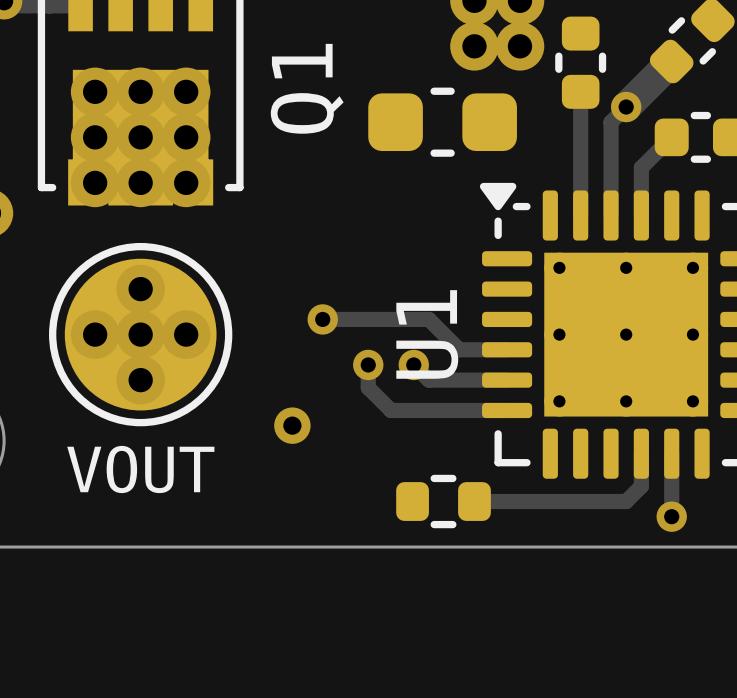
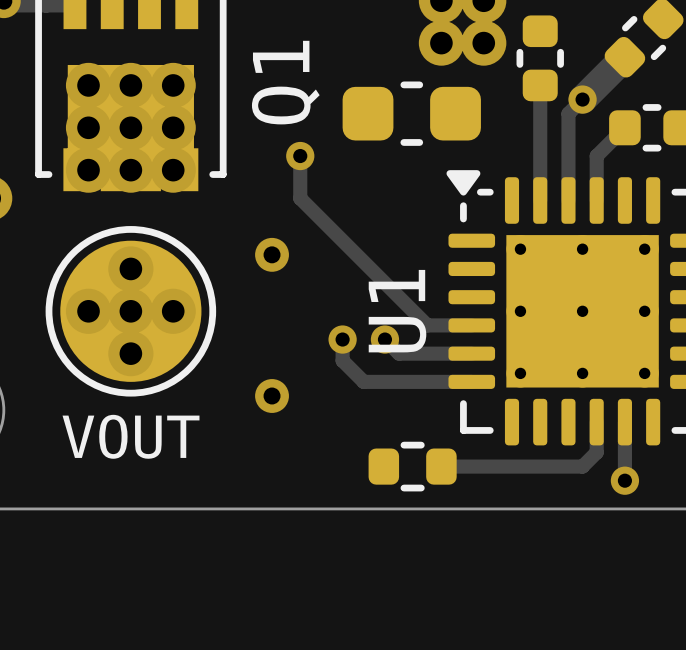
via: none -> (272, 254)
track: (322, 319) (428, 319) -> (300, 156) (300, 198) (399, 297)
via position: (322, 319) -> (300, 156)

